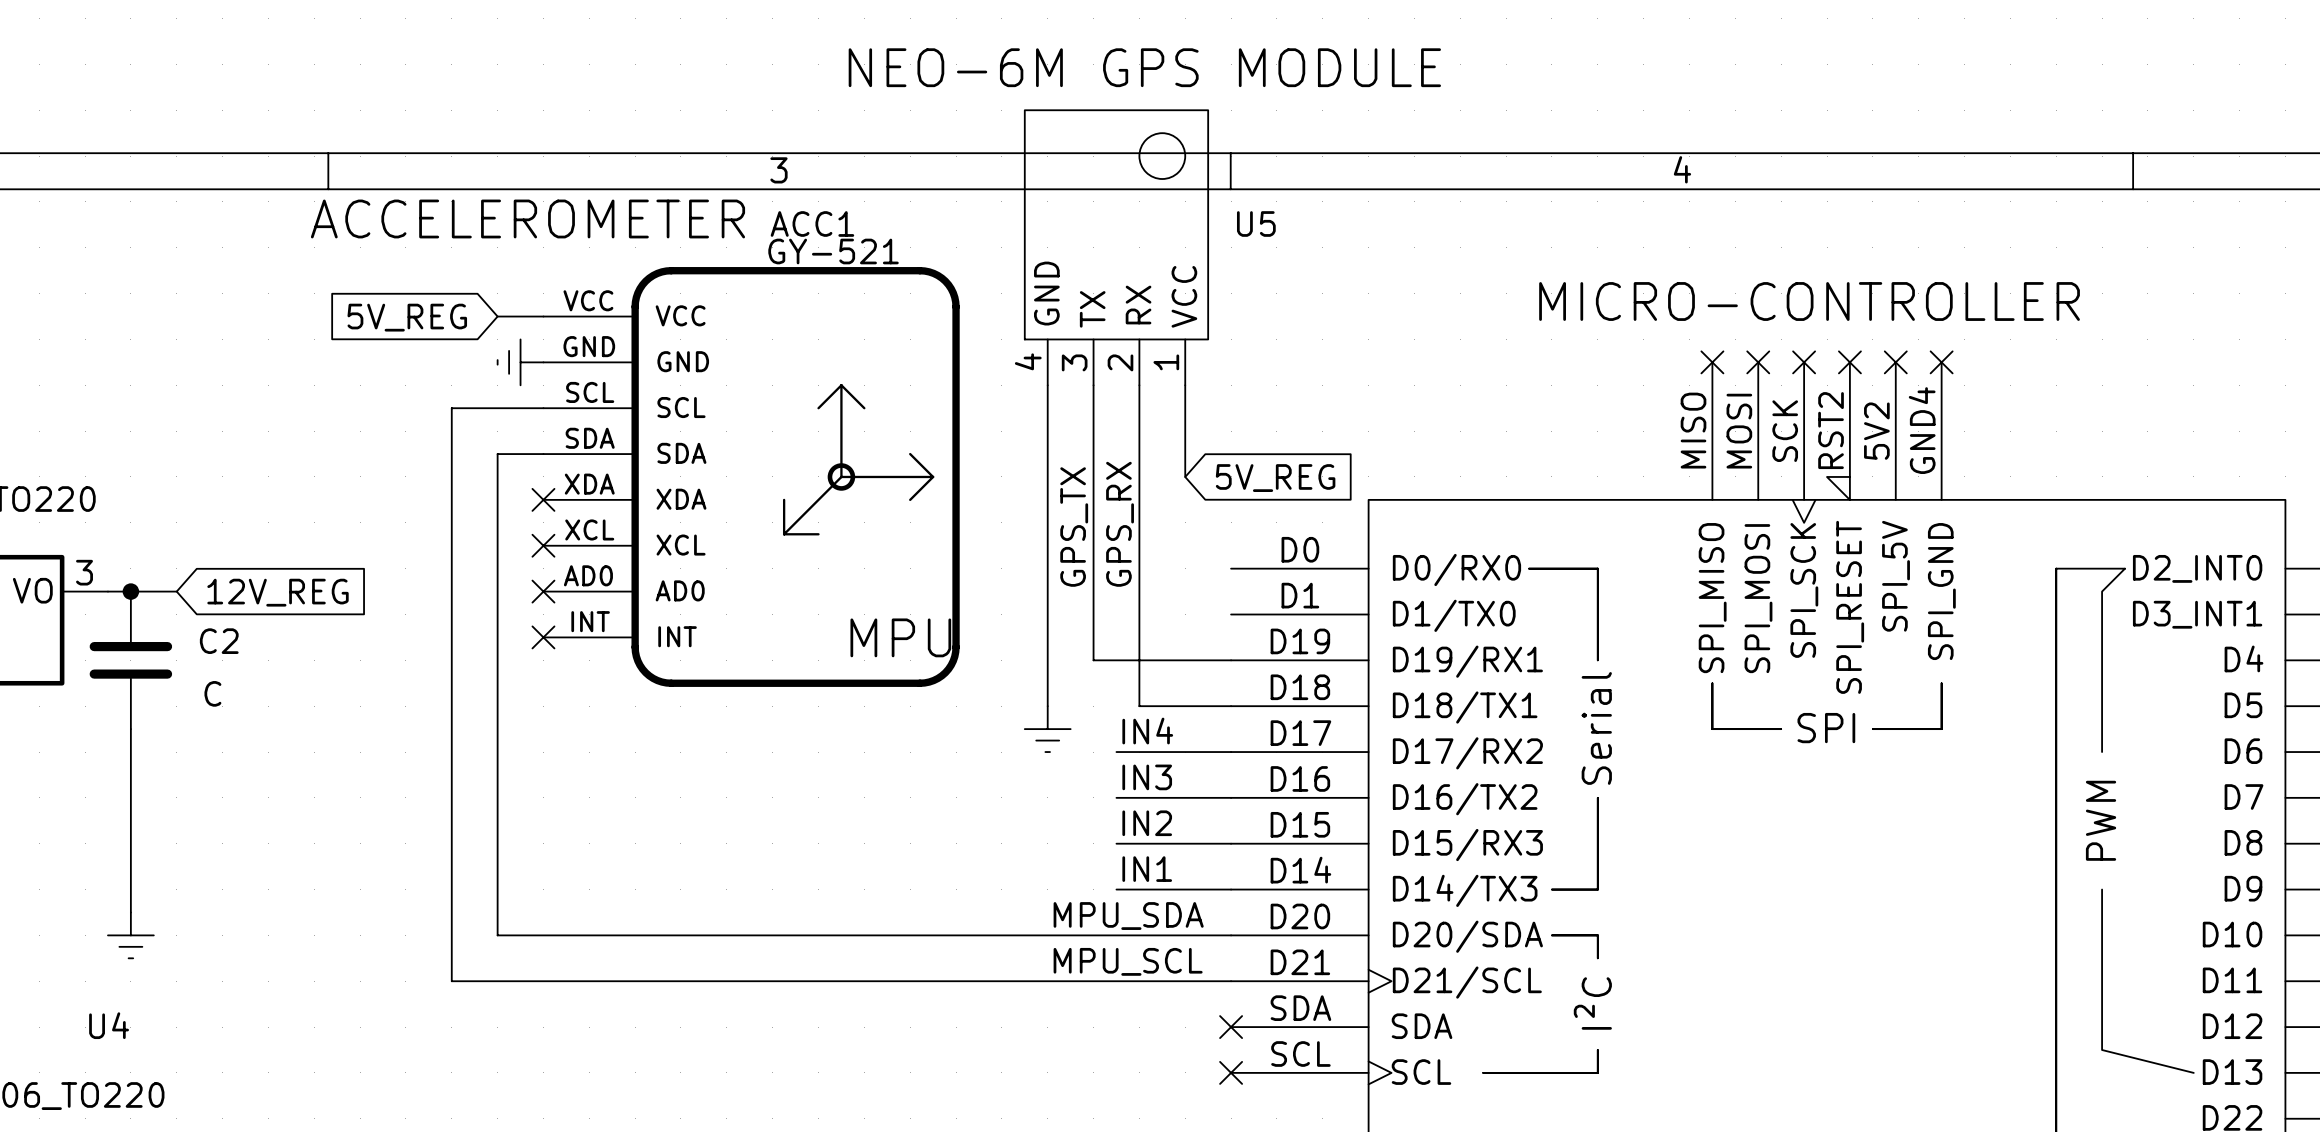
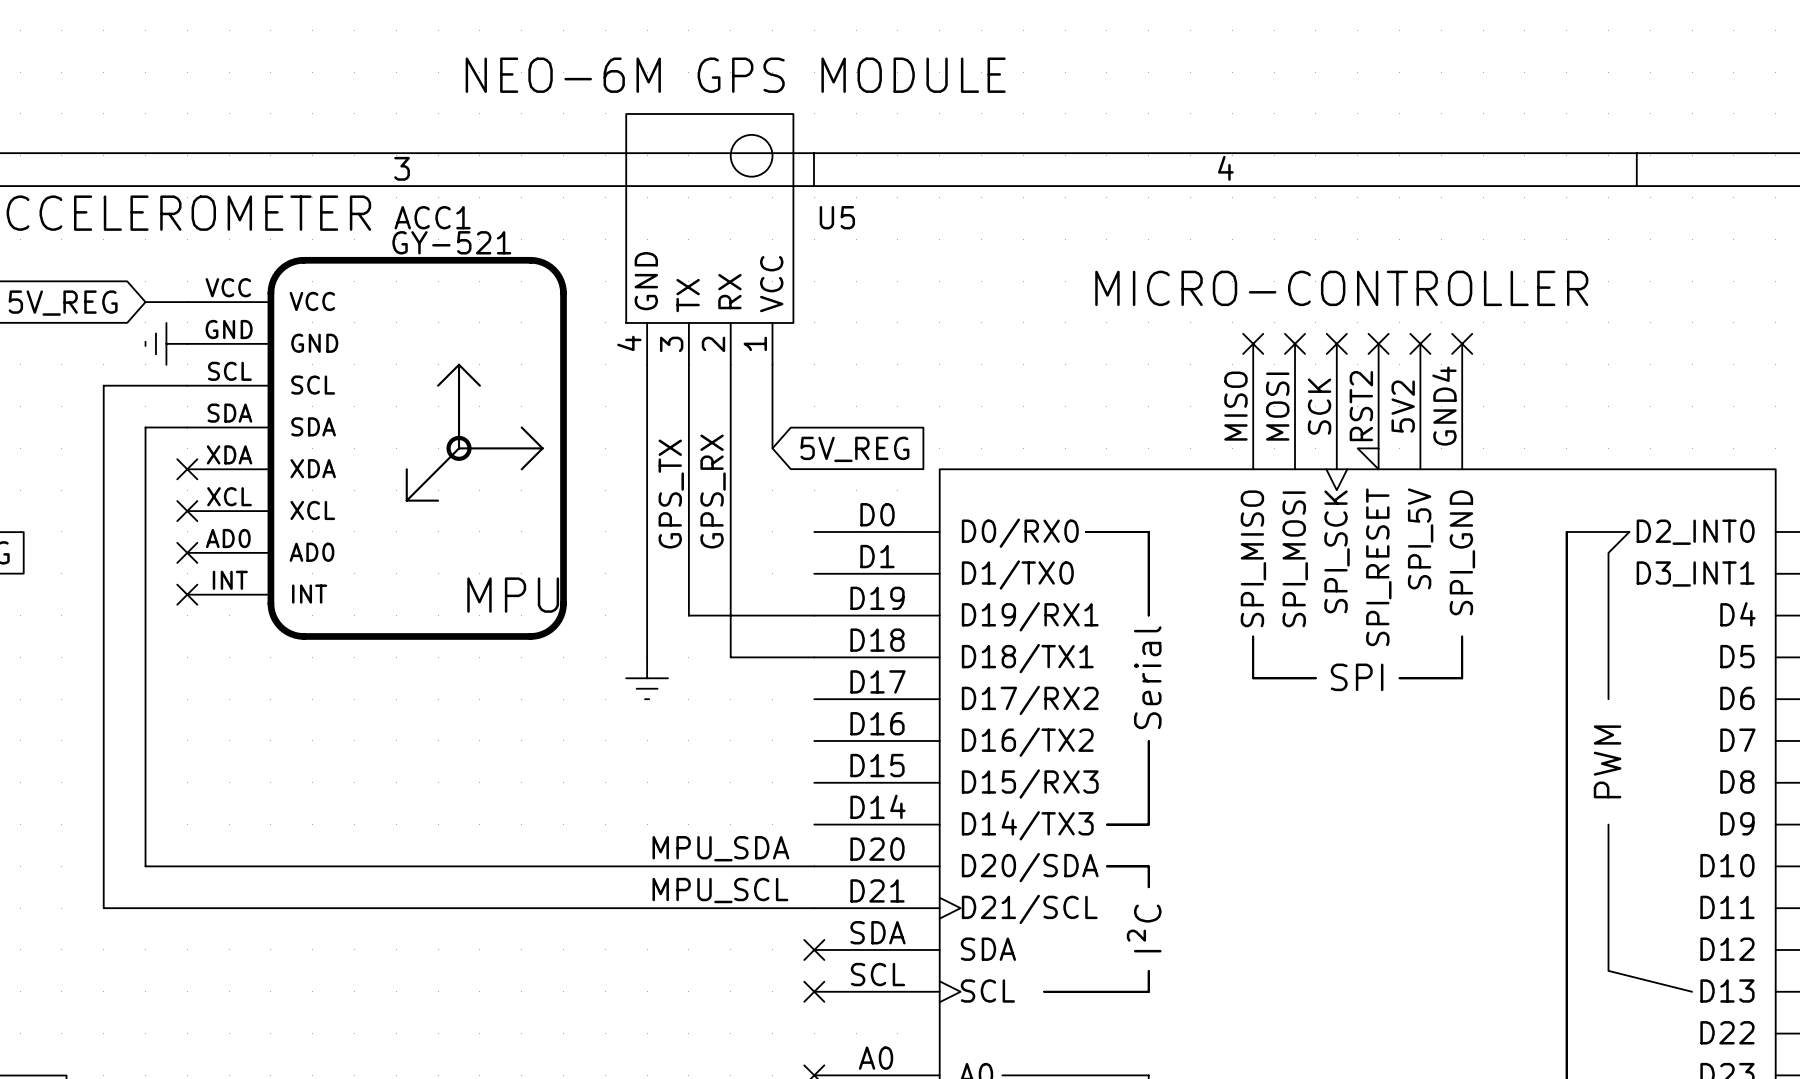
label: IN4 (1147, 731) -> none
wire: (1116, 752) (1231, 752) -> none
label: IN3 (1147, 777) -> none
wire: (1116, 797) (1231, 797) -> none
label: IN2 (1147, 823) -> none
wire: (1116, 843) (1231, 843) -> none
label: IN1 (1147, 869) -> none
wire: (1116, 889) (1231, 889) -> none

